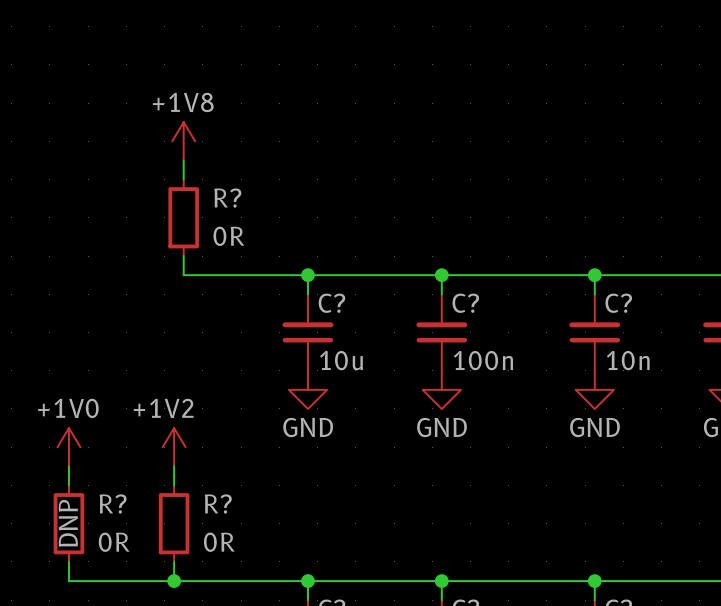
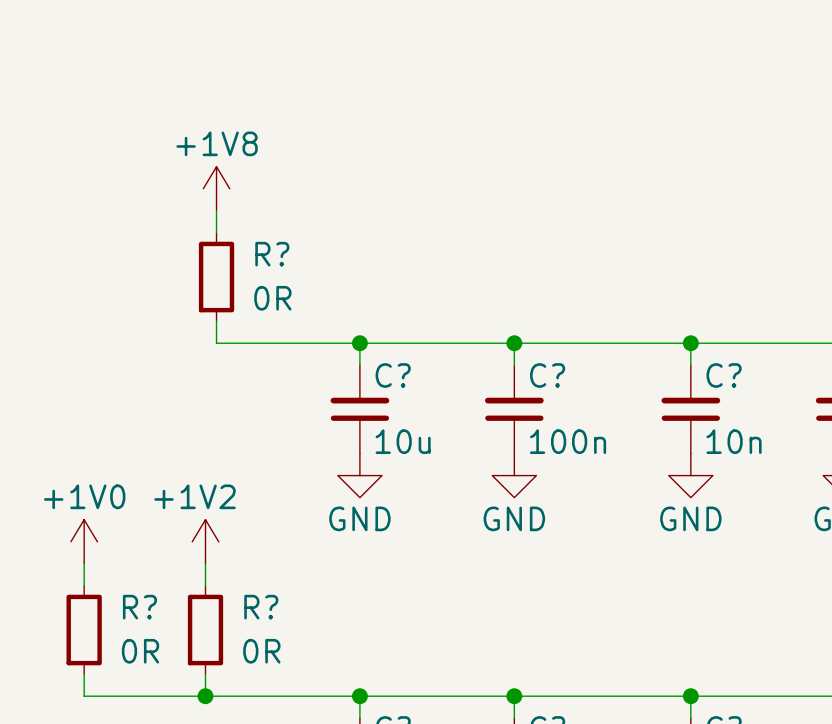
R? text: DNP (68, 523) -> none

